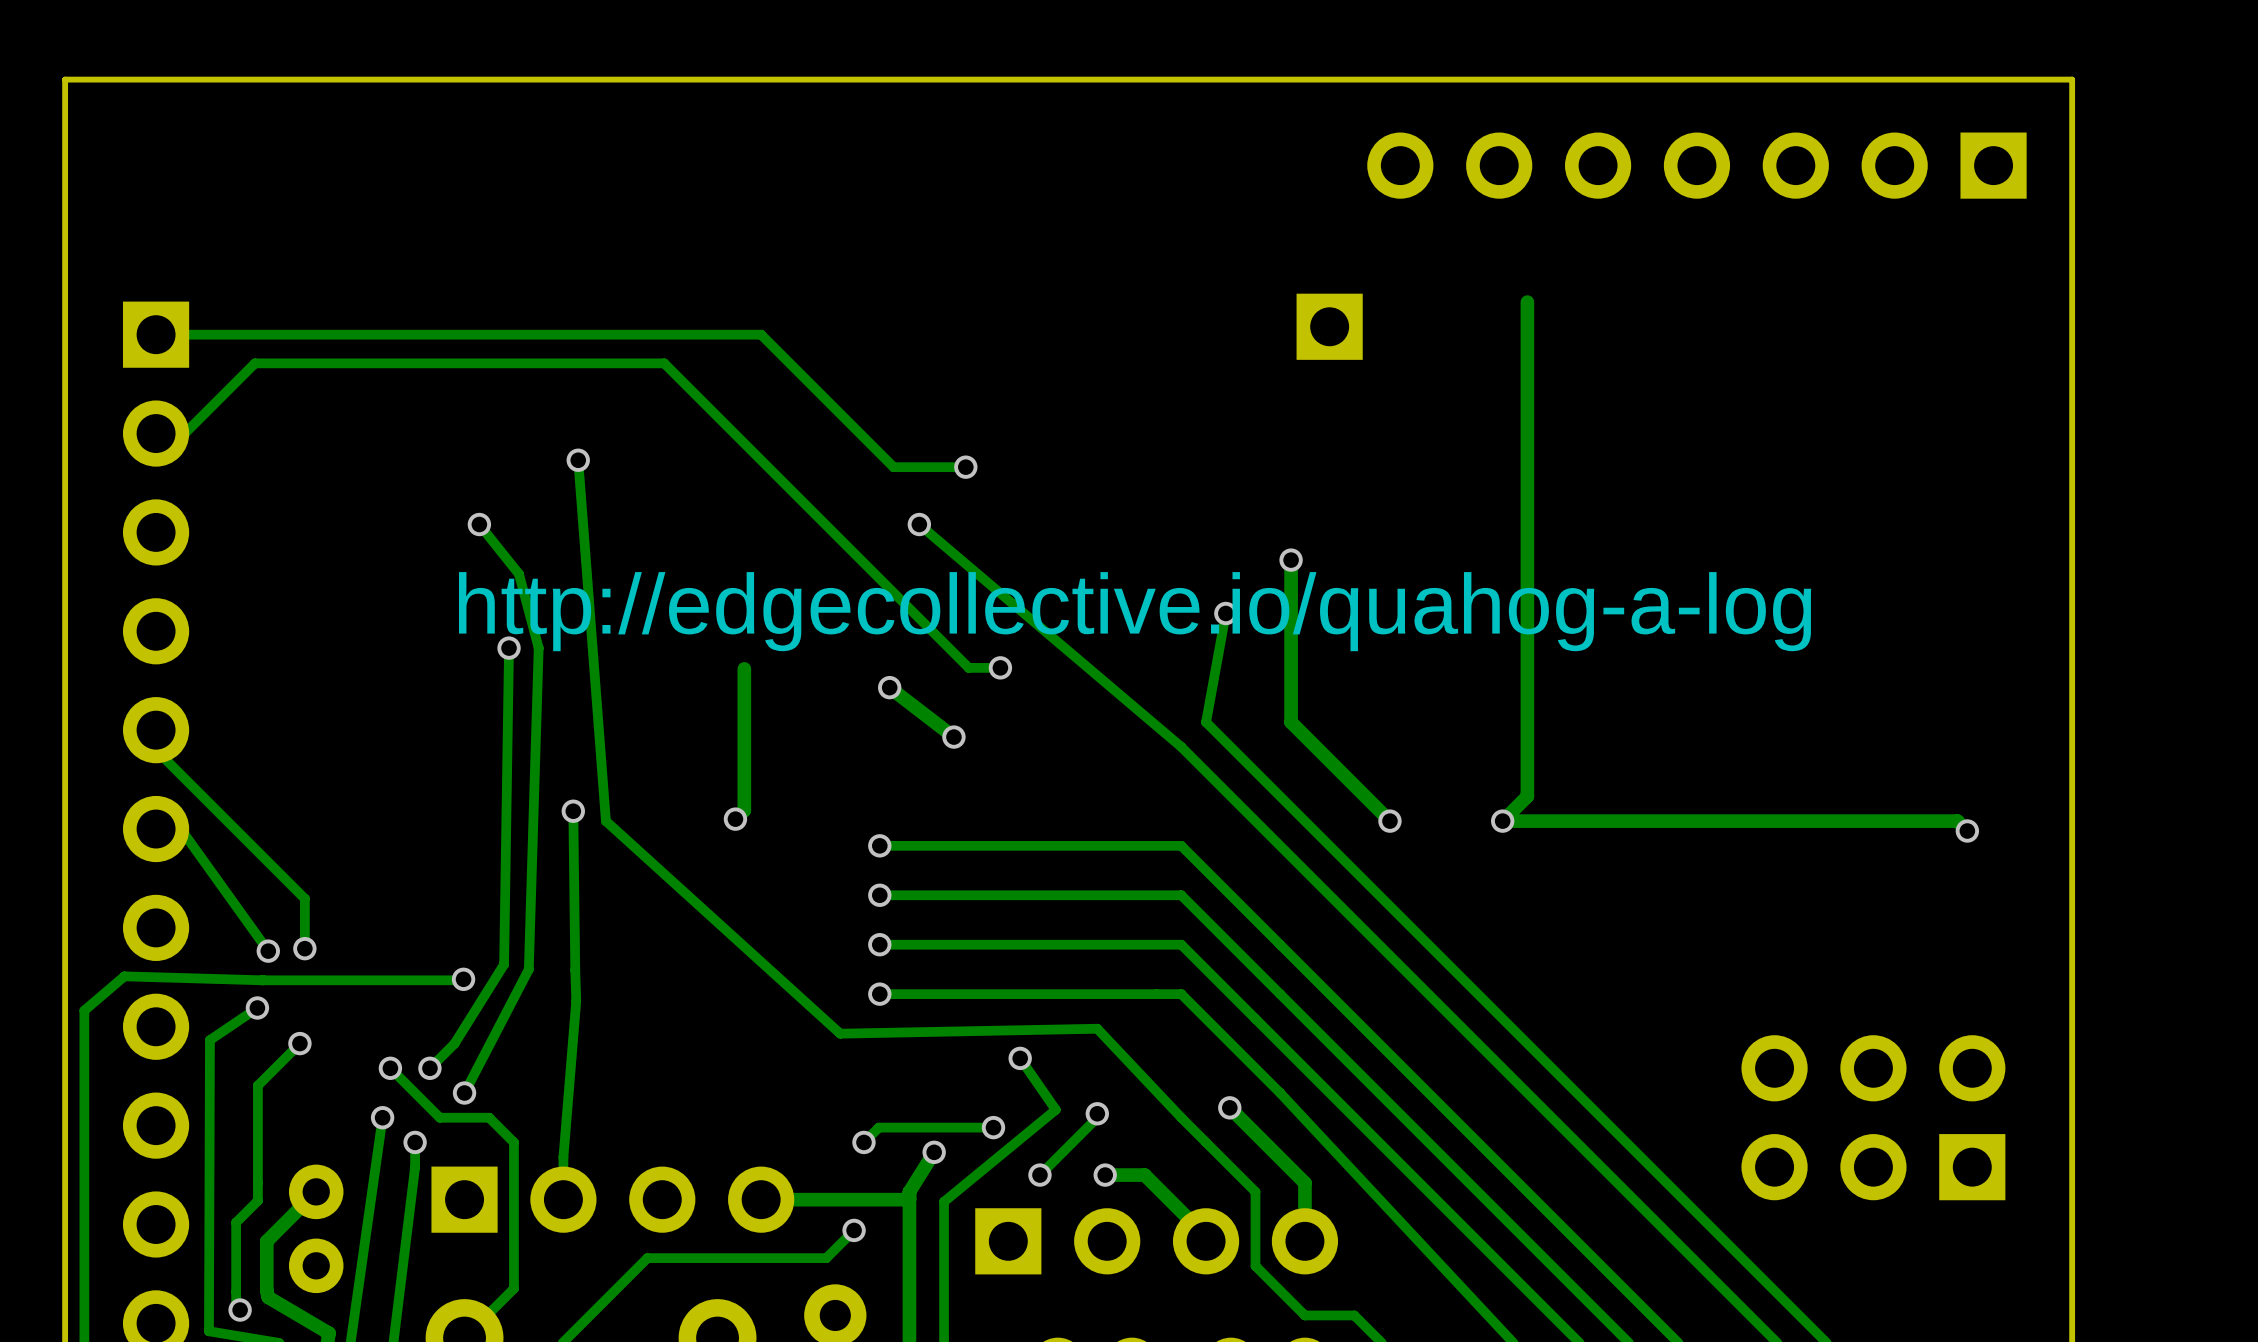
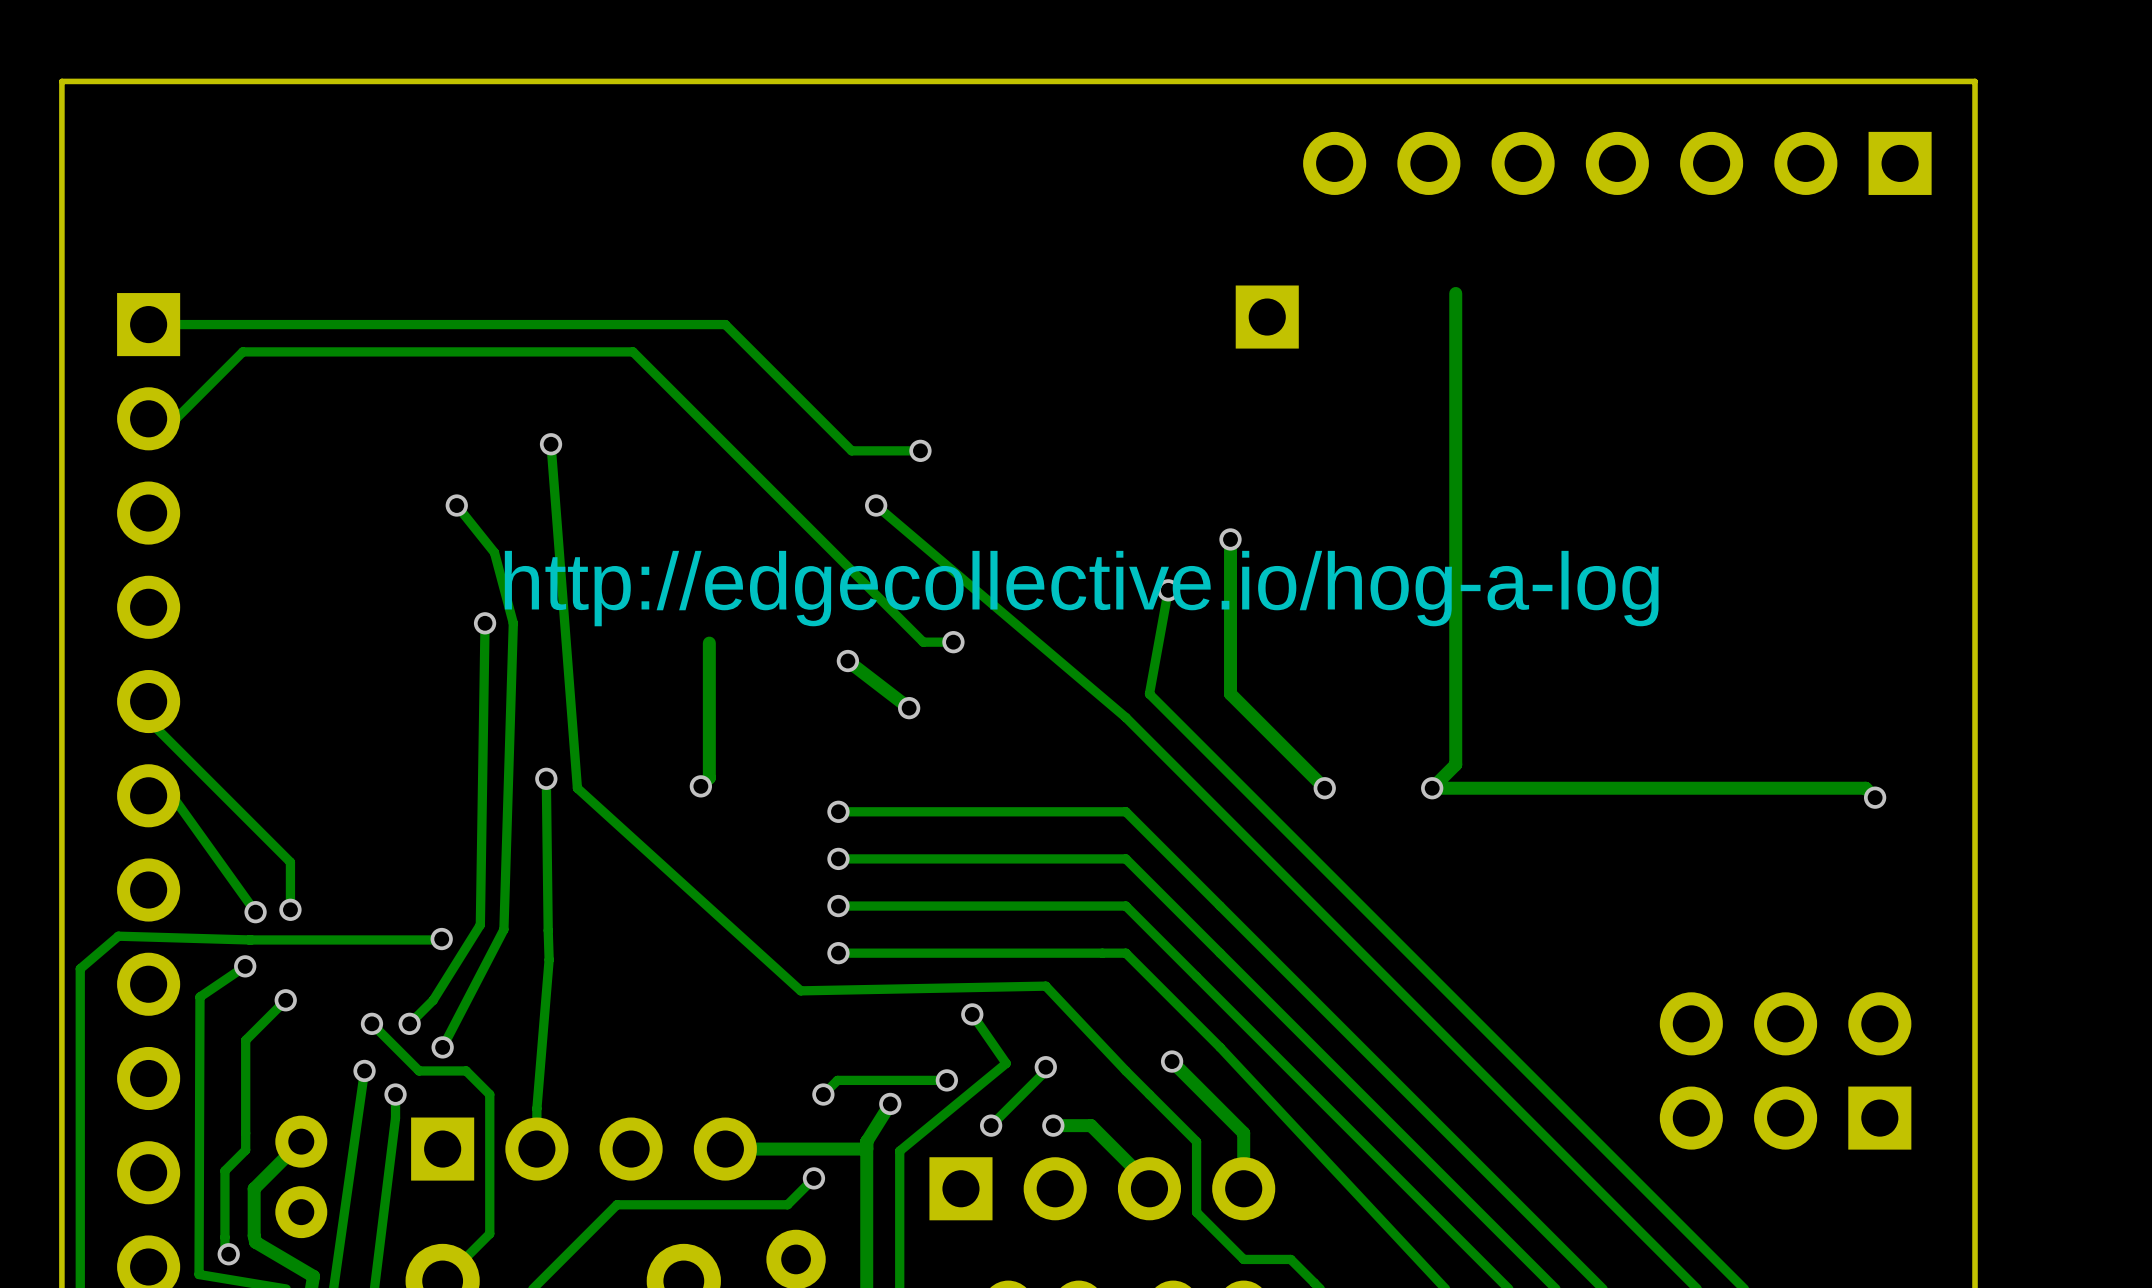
text: http://edgecollective.io/quahog-a-log (1135, 611) -> http://edgecollective.io/hog-a-log (1081, 588)

